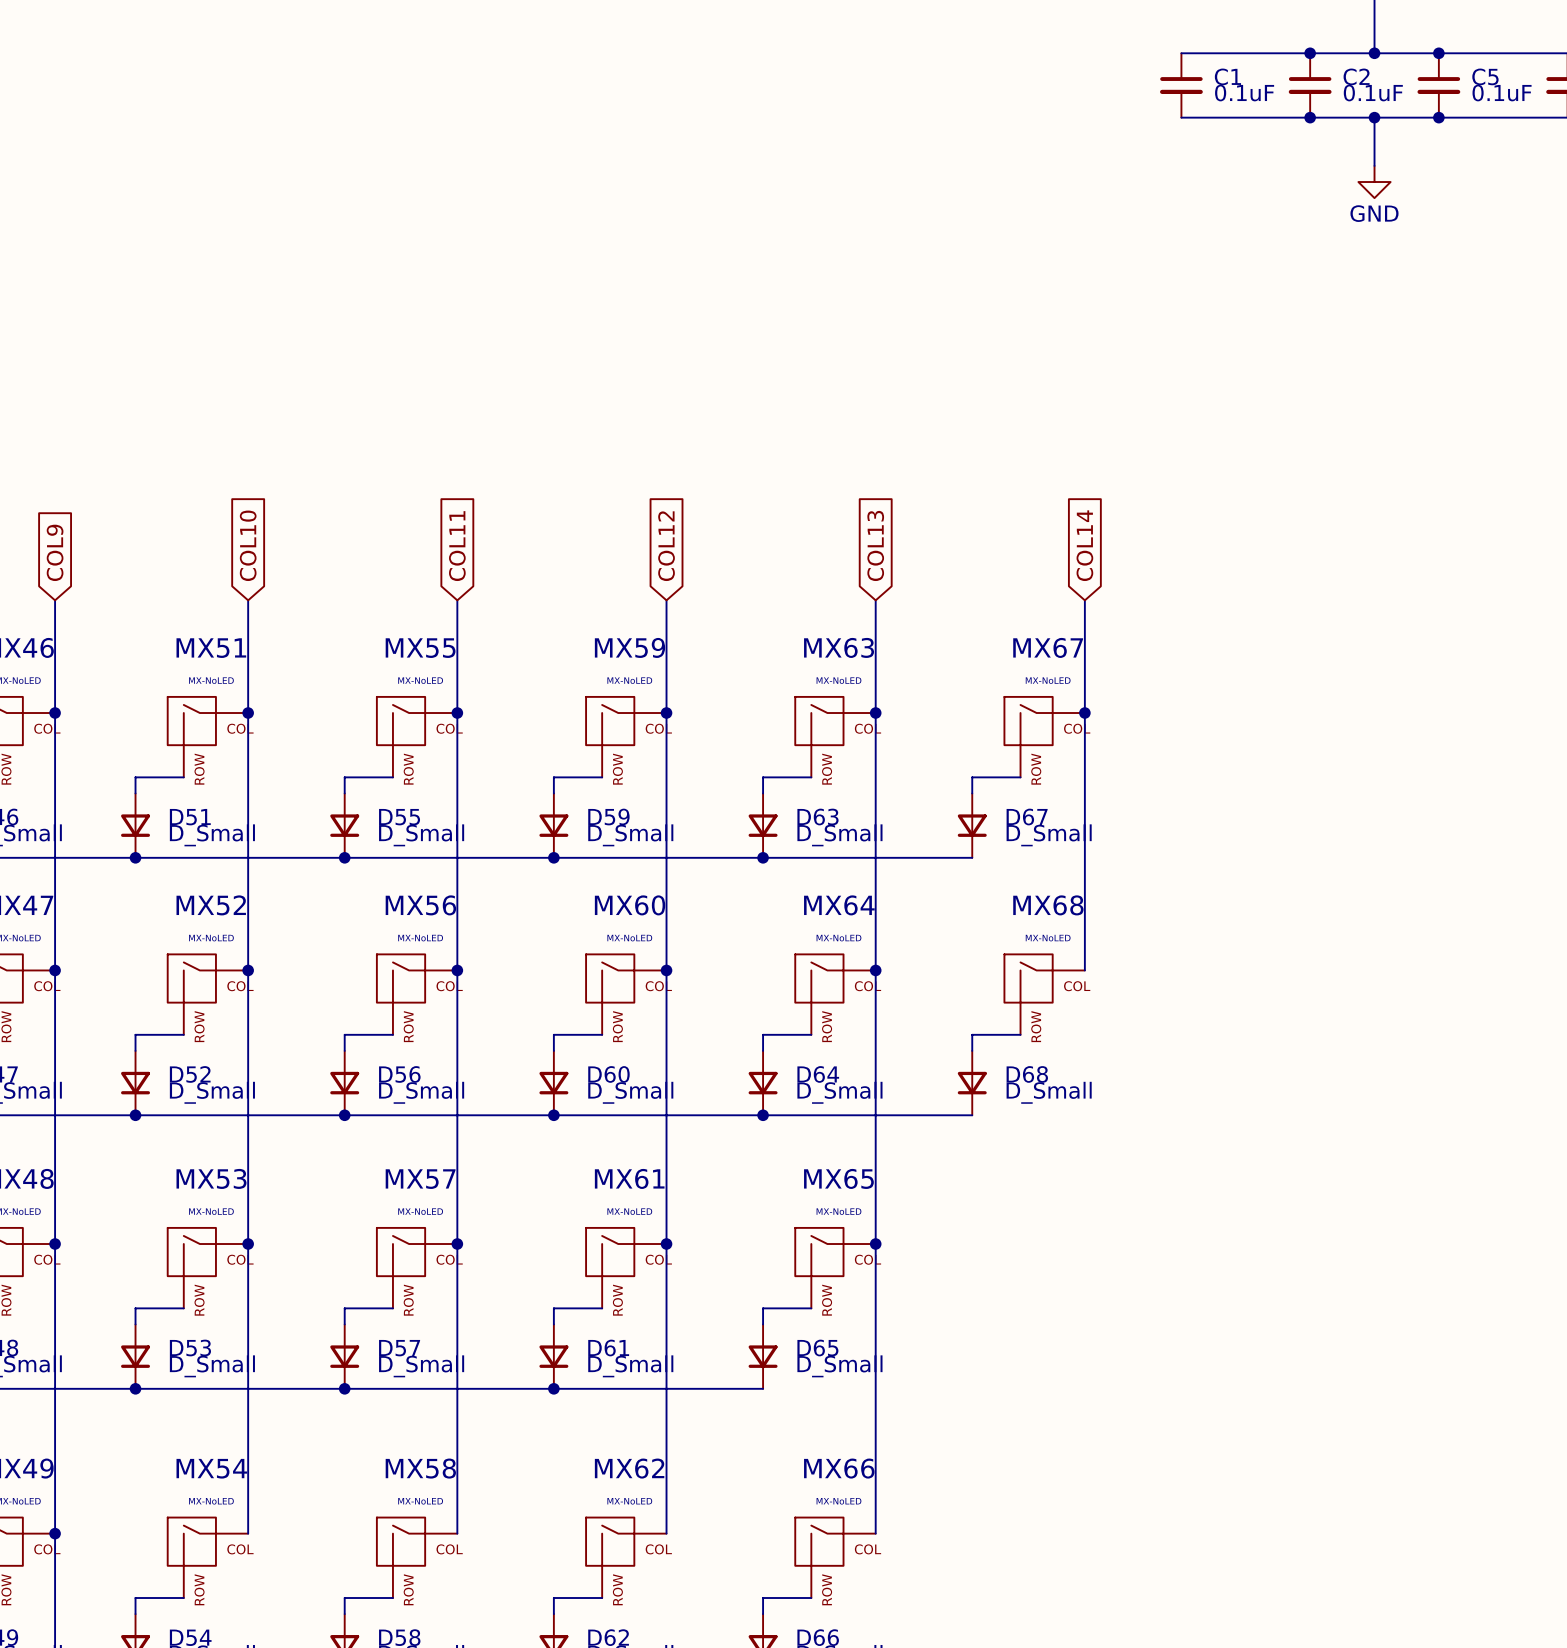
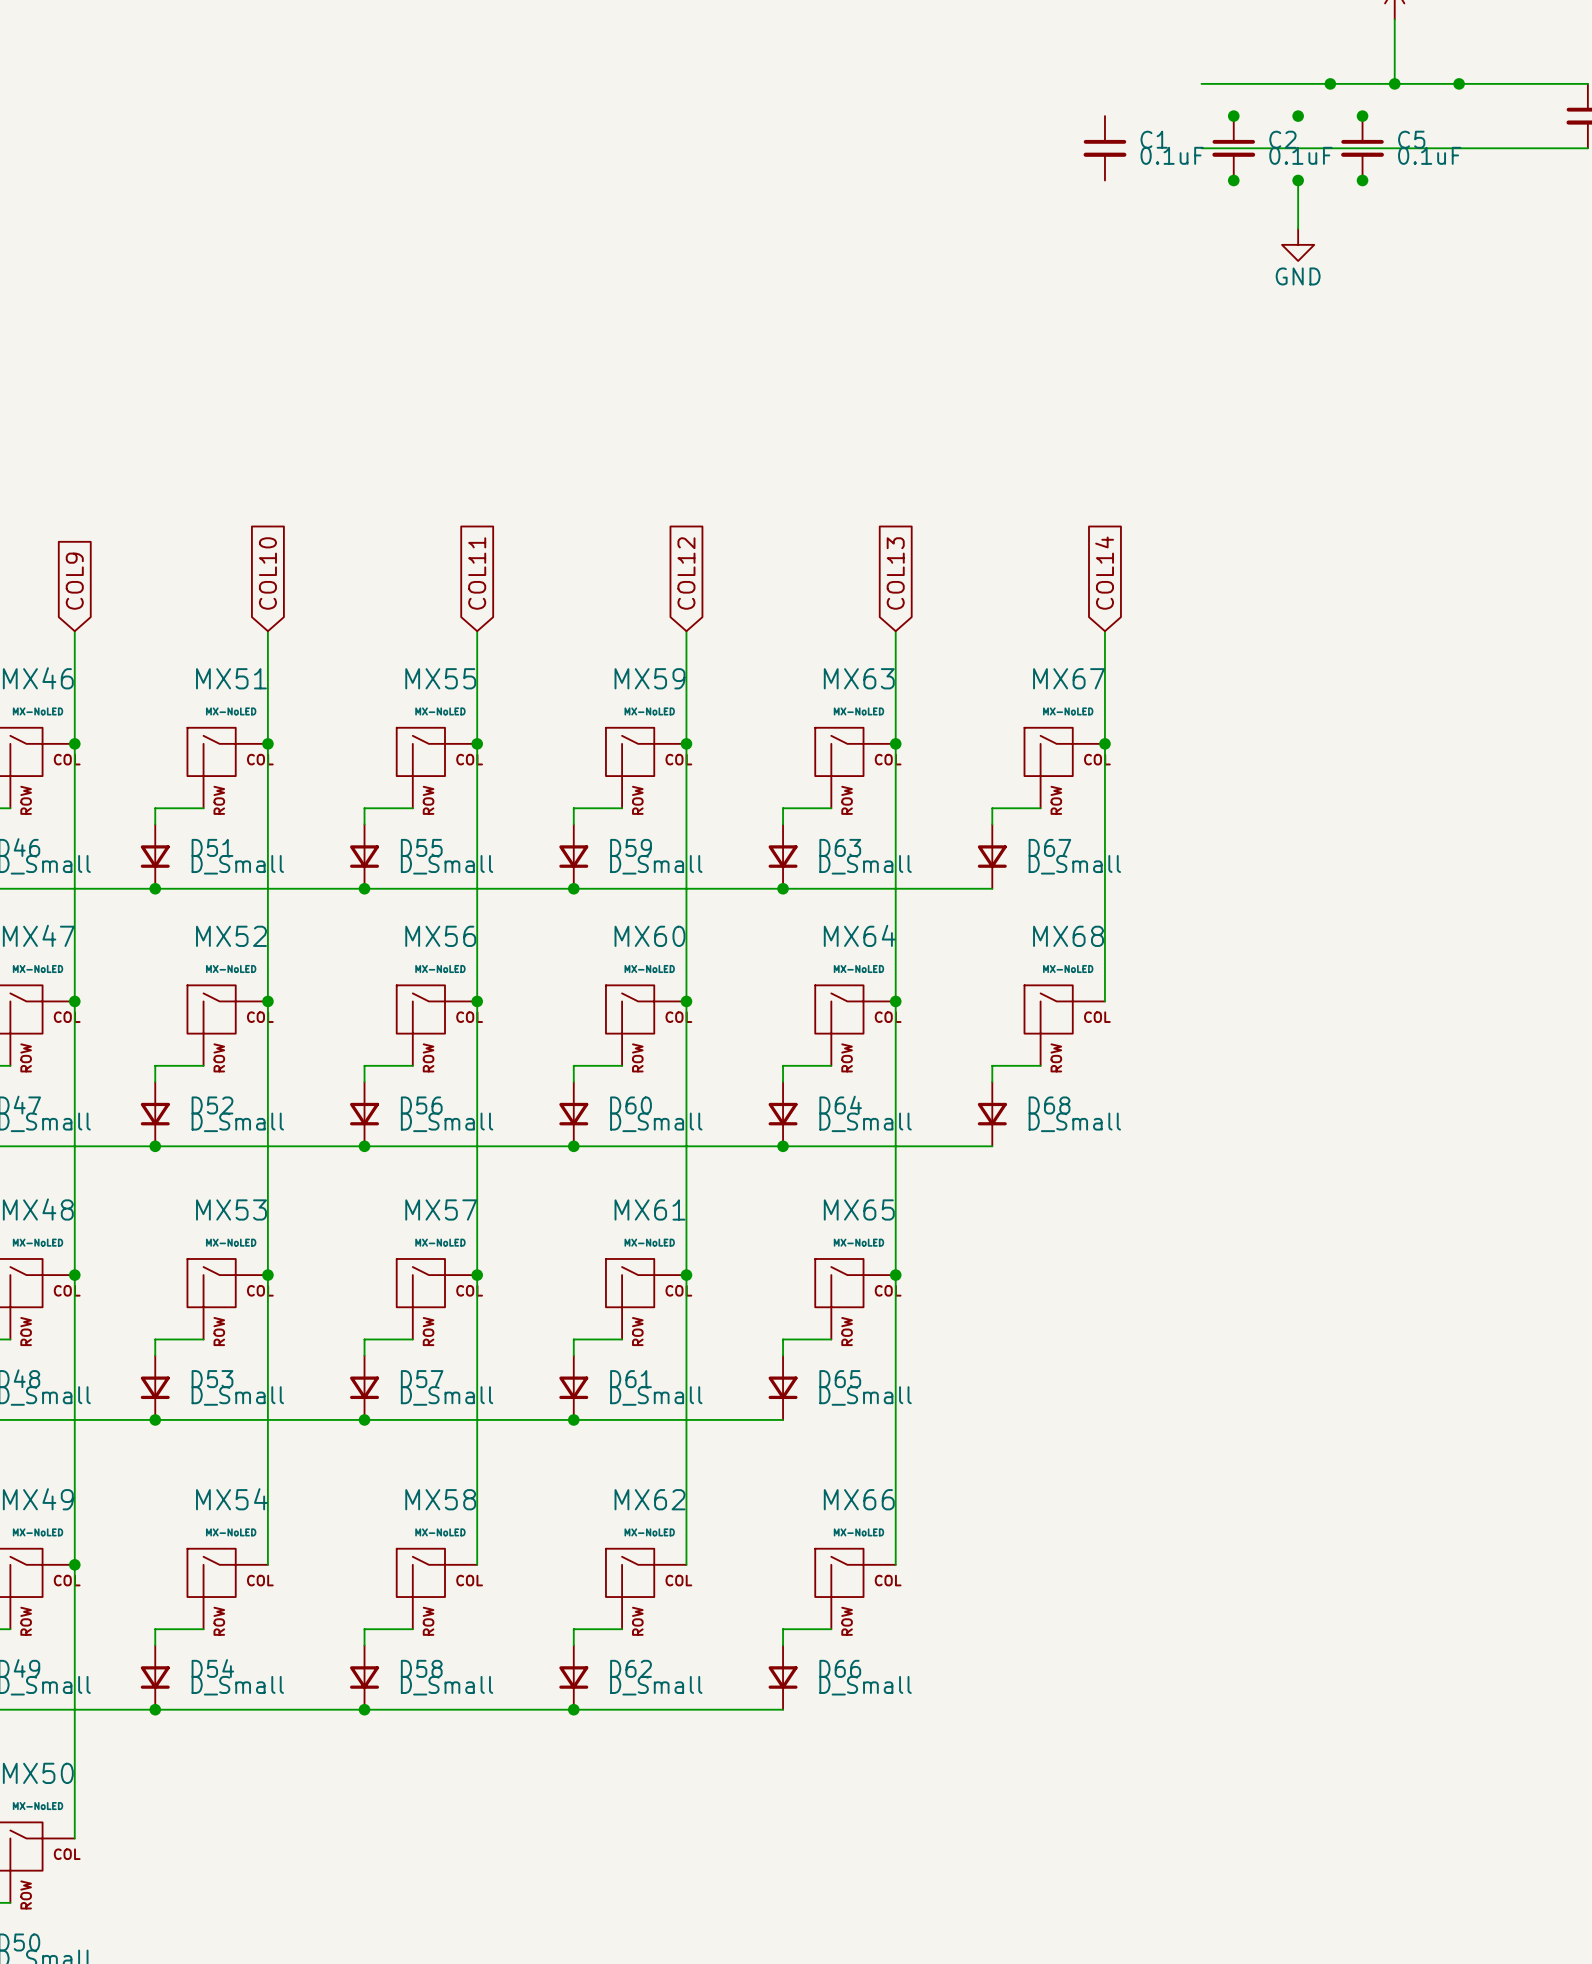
C1 position: (1181, 85) -> (1104, 148)
junction: none -> (1233, 116)
junction: none -> (1298, 116)
C2 position: (1310, 85) -> (1233, 148)
junction: none -> (1362, 116)
C5 position: (1438, 85) -> (1362, 148)
junction: (1310, 117) -> none
wire: (1374, 117) (1374, 165) -> (1298, 180) (1298, 228)
junction: (1374, 117) -> none
junction: (1438, 117) -> none
junction: none -> (1233, 180)
junction: none -> (1298, 180)
junction: none -> (1362, 180)
power symbol position: GND (1374, 182) -> GND (1298, 244)

